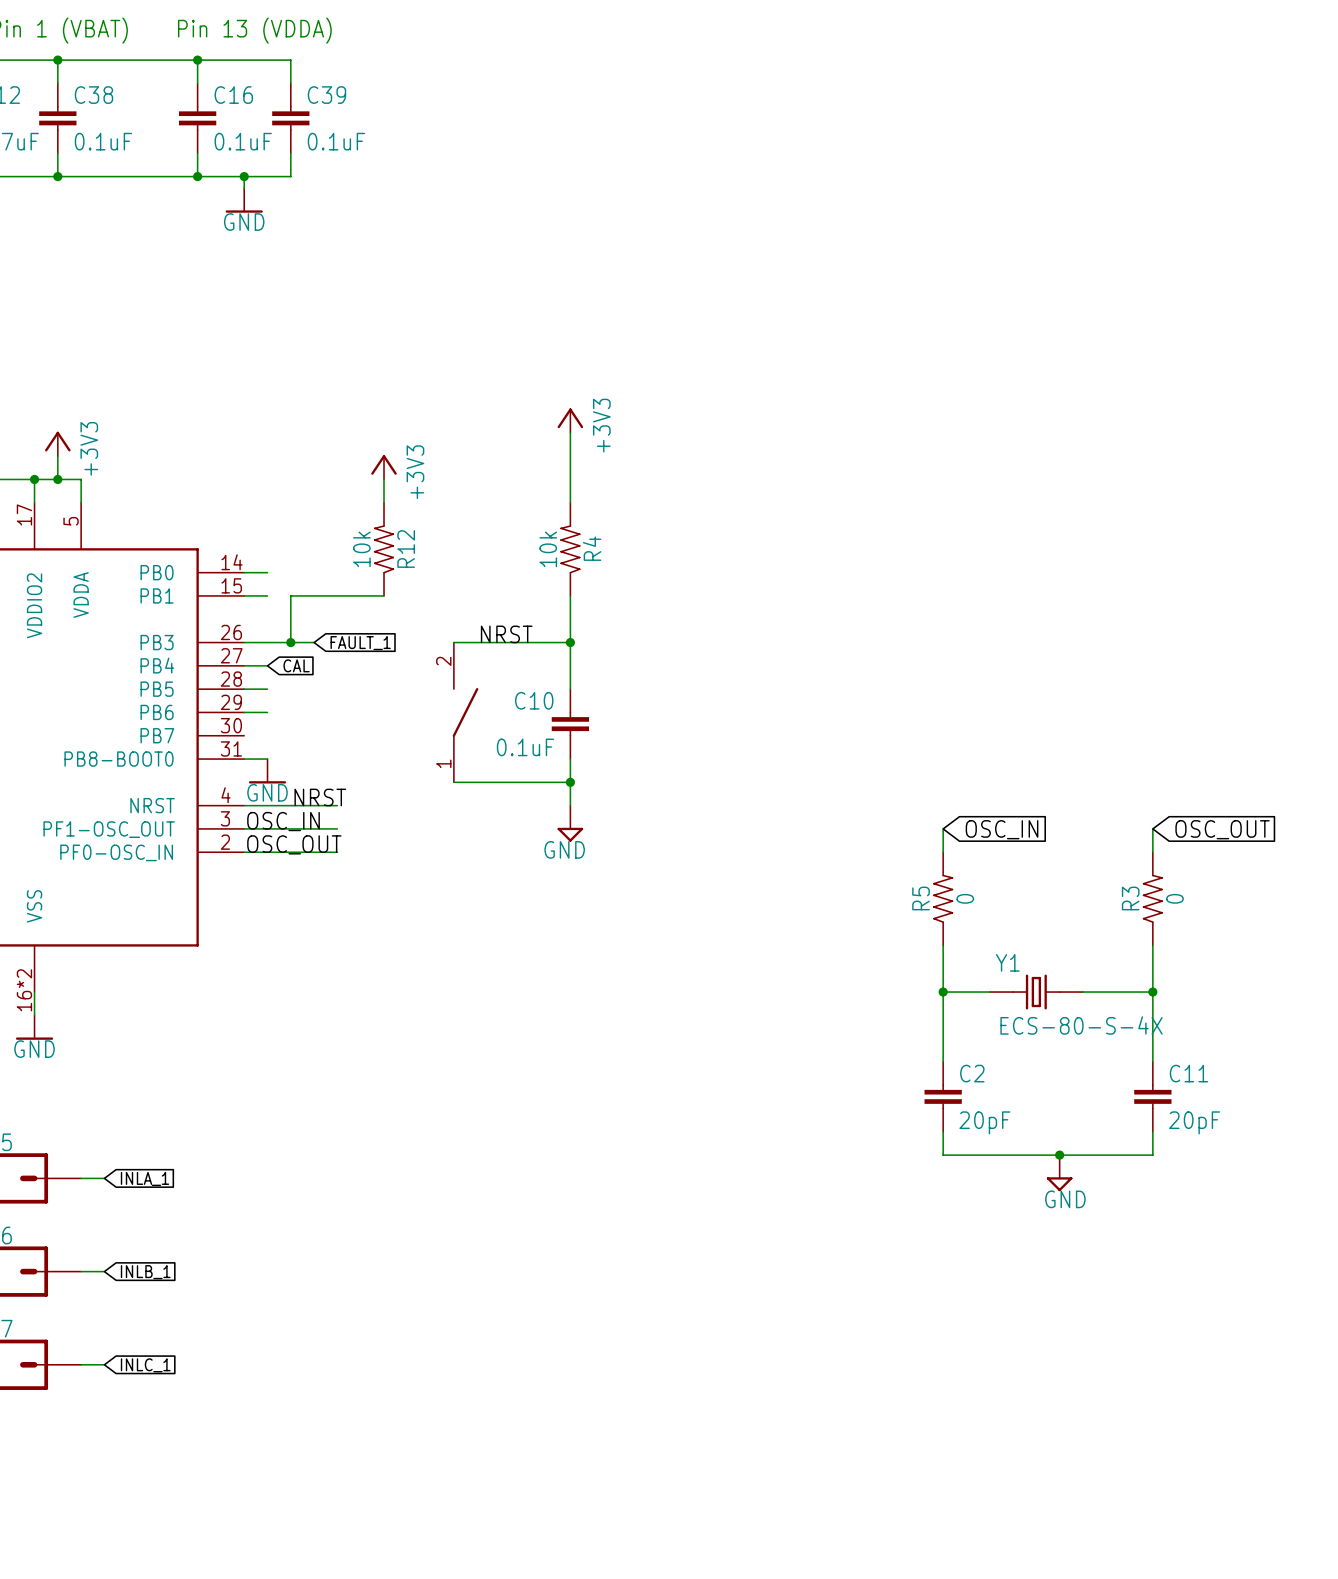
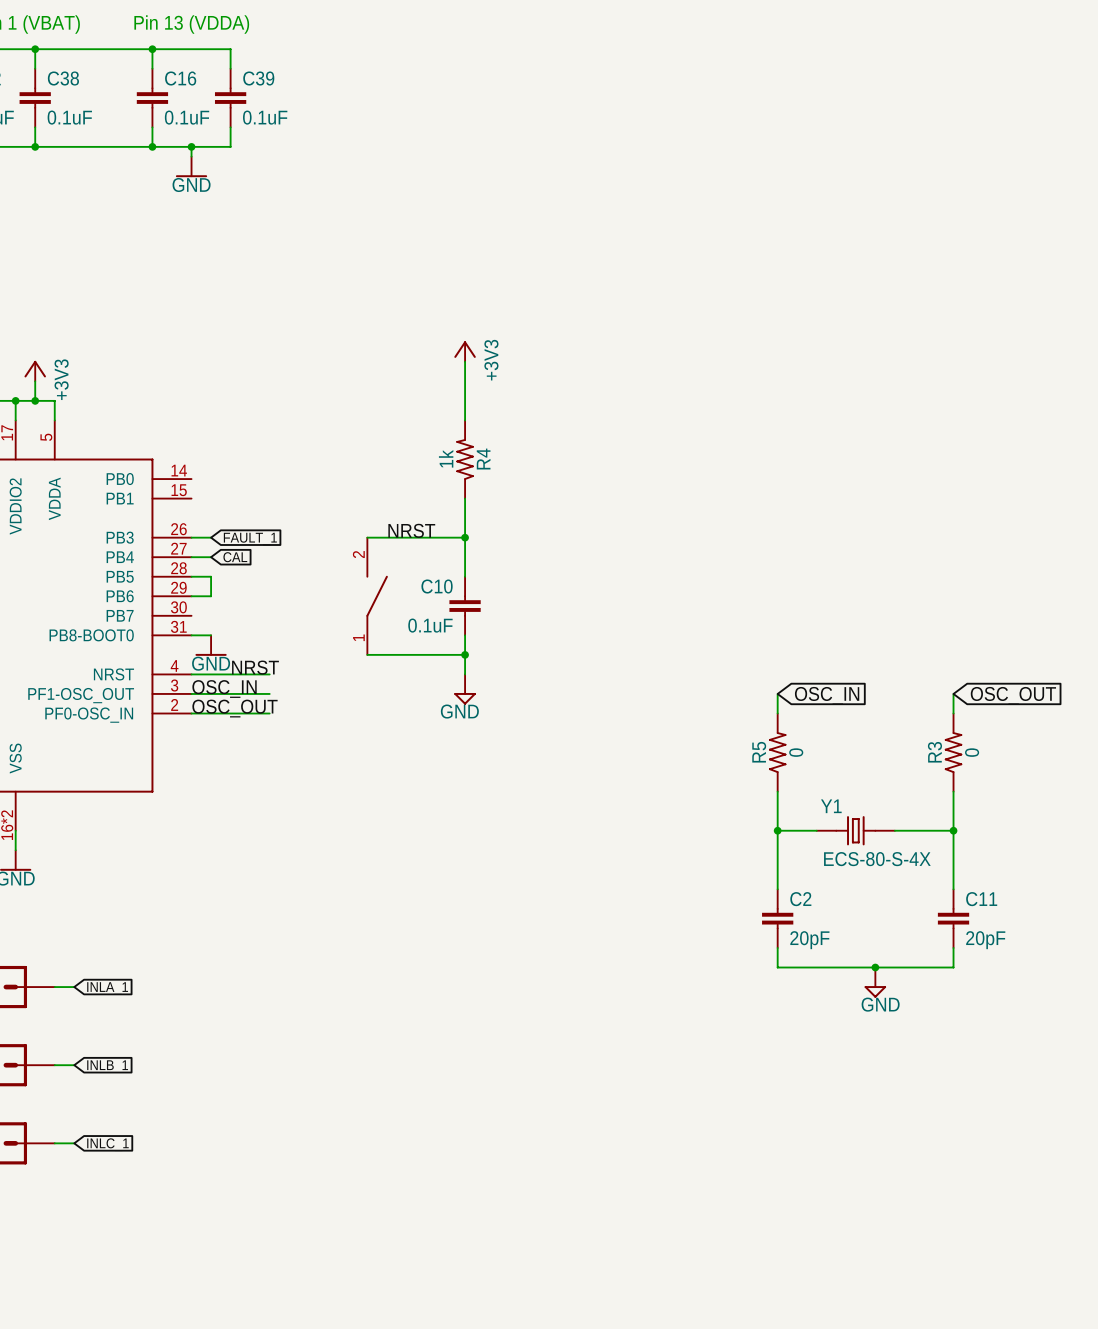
power symbol: +3V3 (384, 467) -> none
wire: (384, 479) (384, 502) -> none
R12: 10k (384, 549) -> none
R4 value: 10k (548, 549) -> 1k (446, 458)
wire: (244, 572) (267, 572) -> none
wire: (244, 595) (267, 595) -> none
wire: (384, 595) (290, 595) (290, 642) -> none
wire: (267, 642) (314, 642) -> none
junction: (290, 642) -> none
global label position: FAULT_1 (360, 643) -> FAULT_1 (250, 539)
wire: none -> (211, 576) (211, 596)

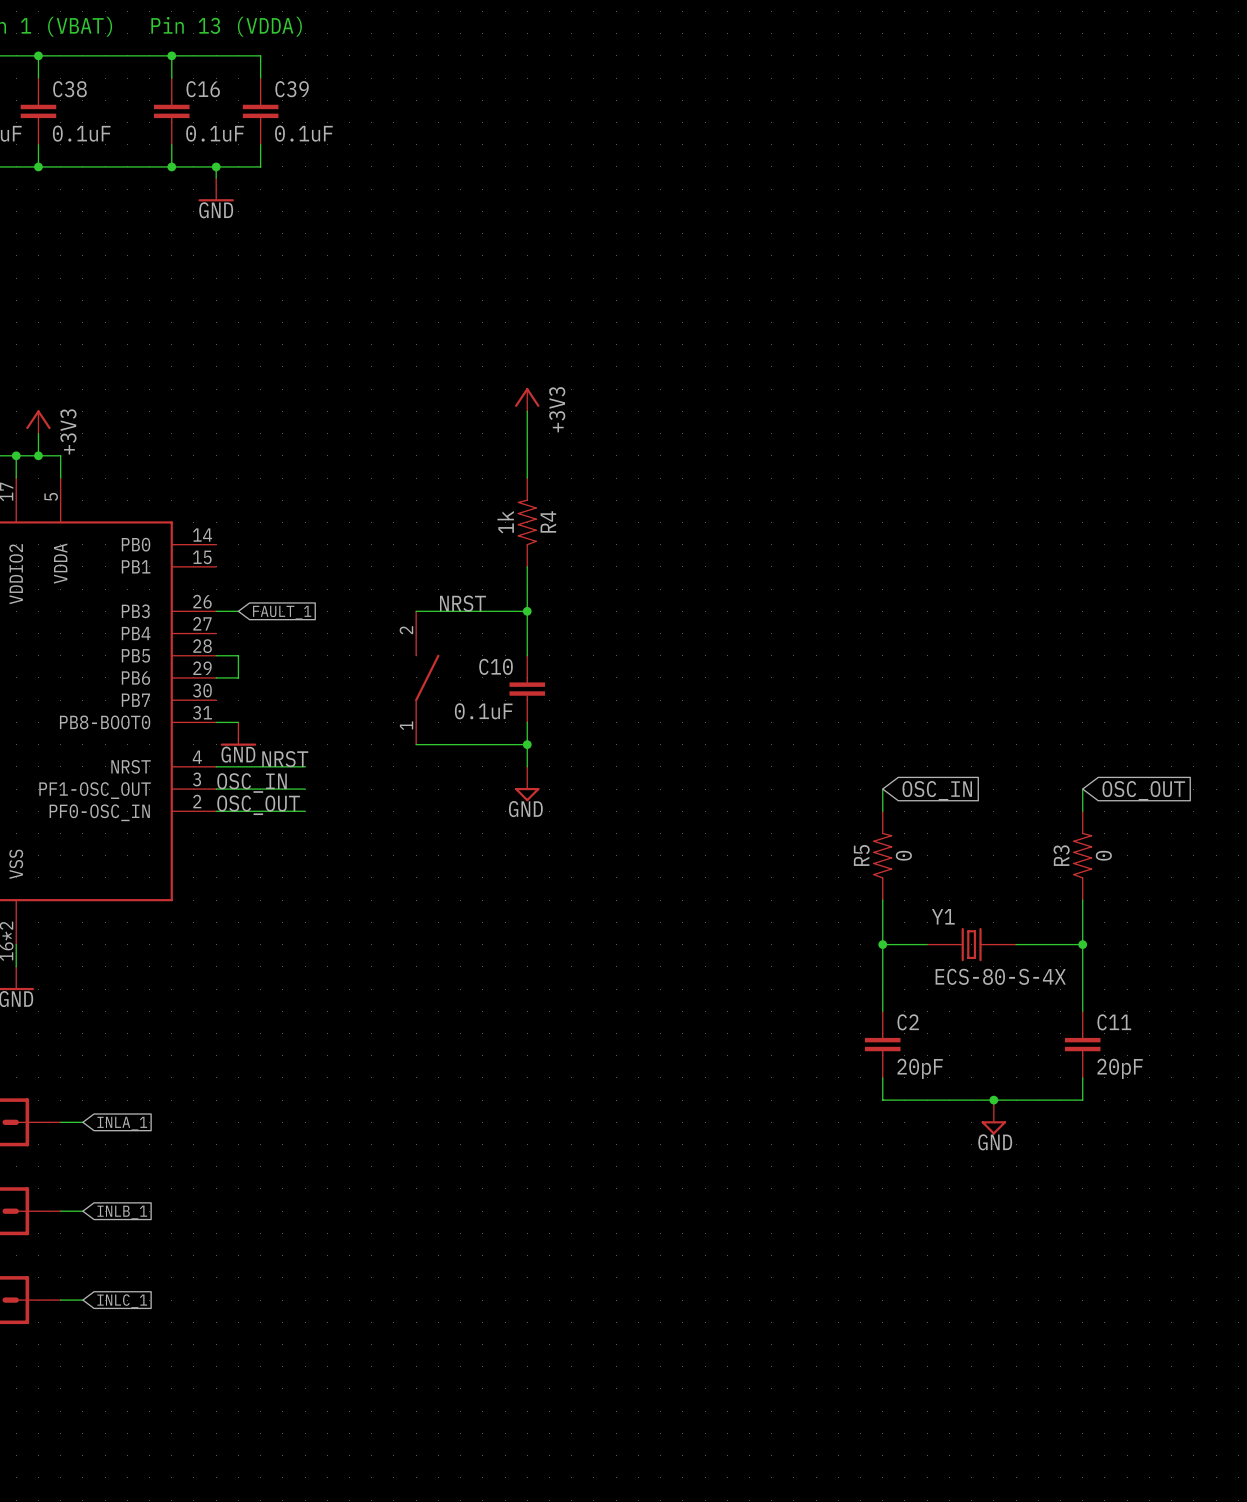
wire: (191, 557) (211, 557) -> none
global label: CAL (235, 557) -> none

